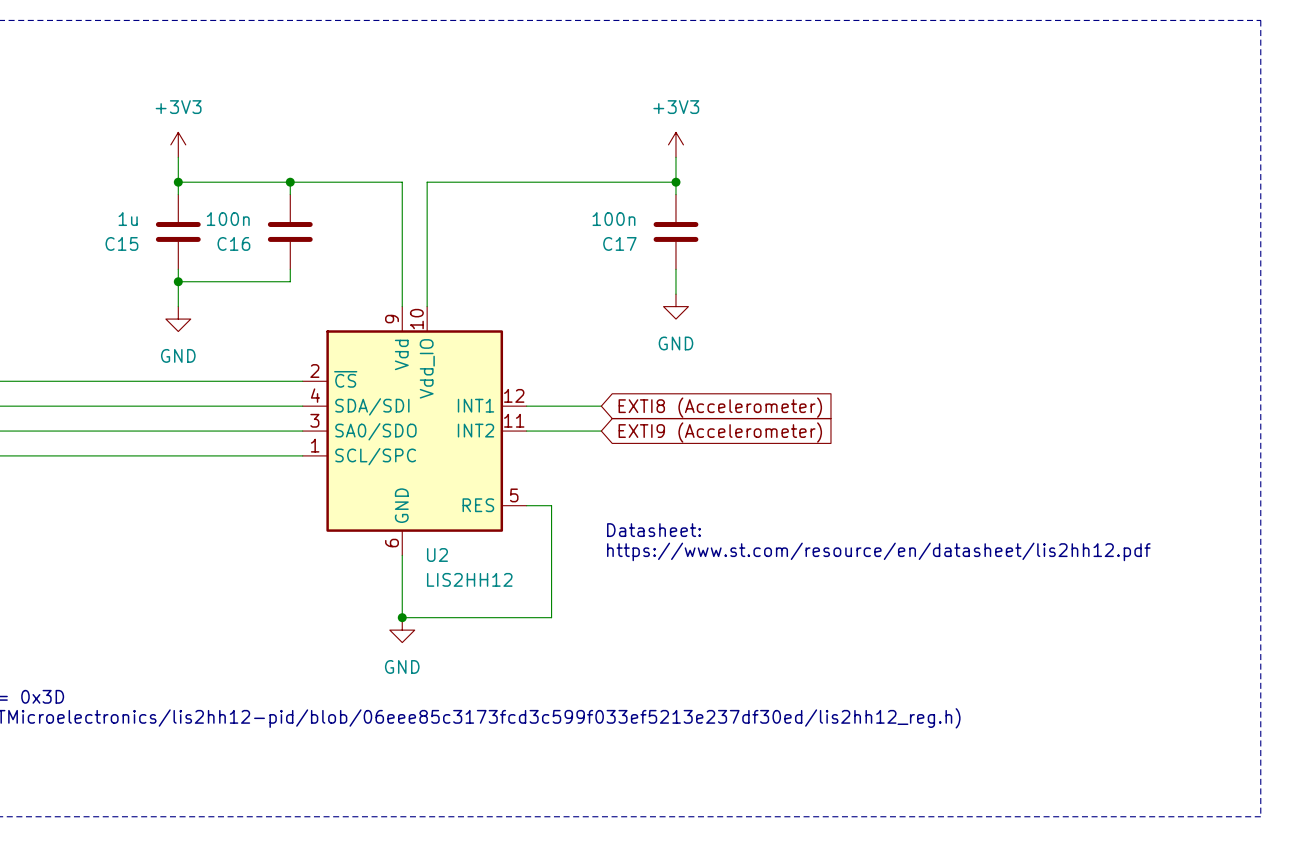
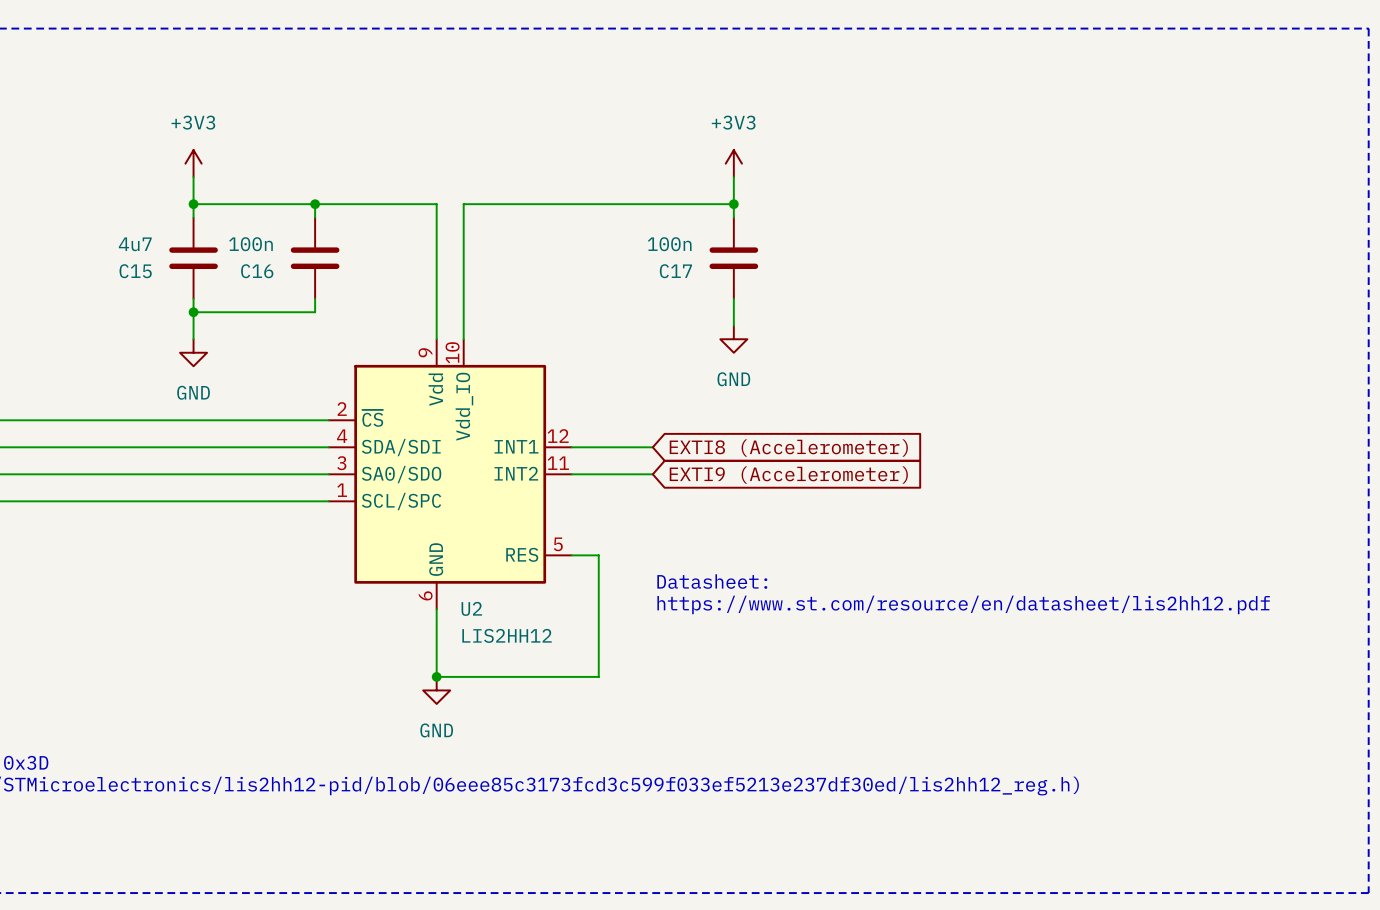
C15 value: 1u (128, 219) -> 4u7 (135, 244)

